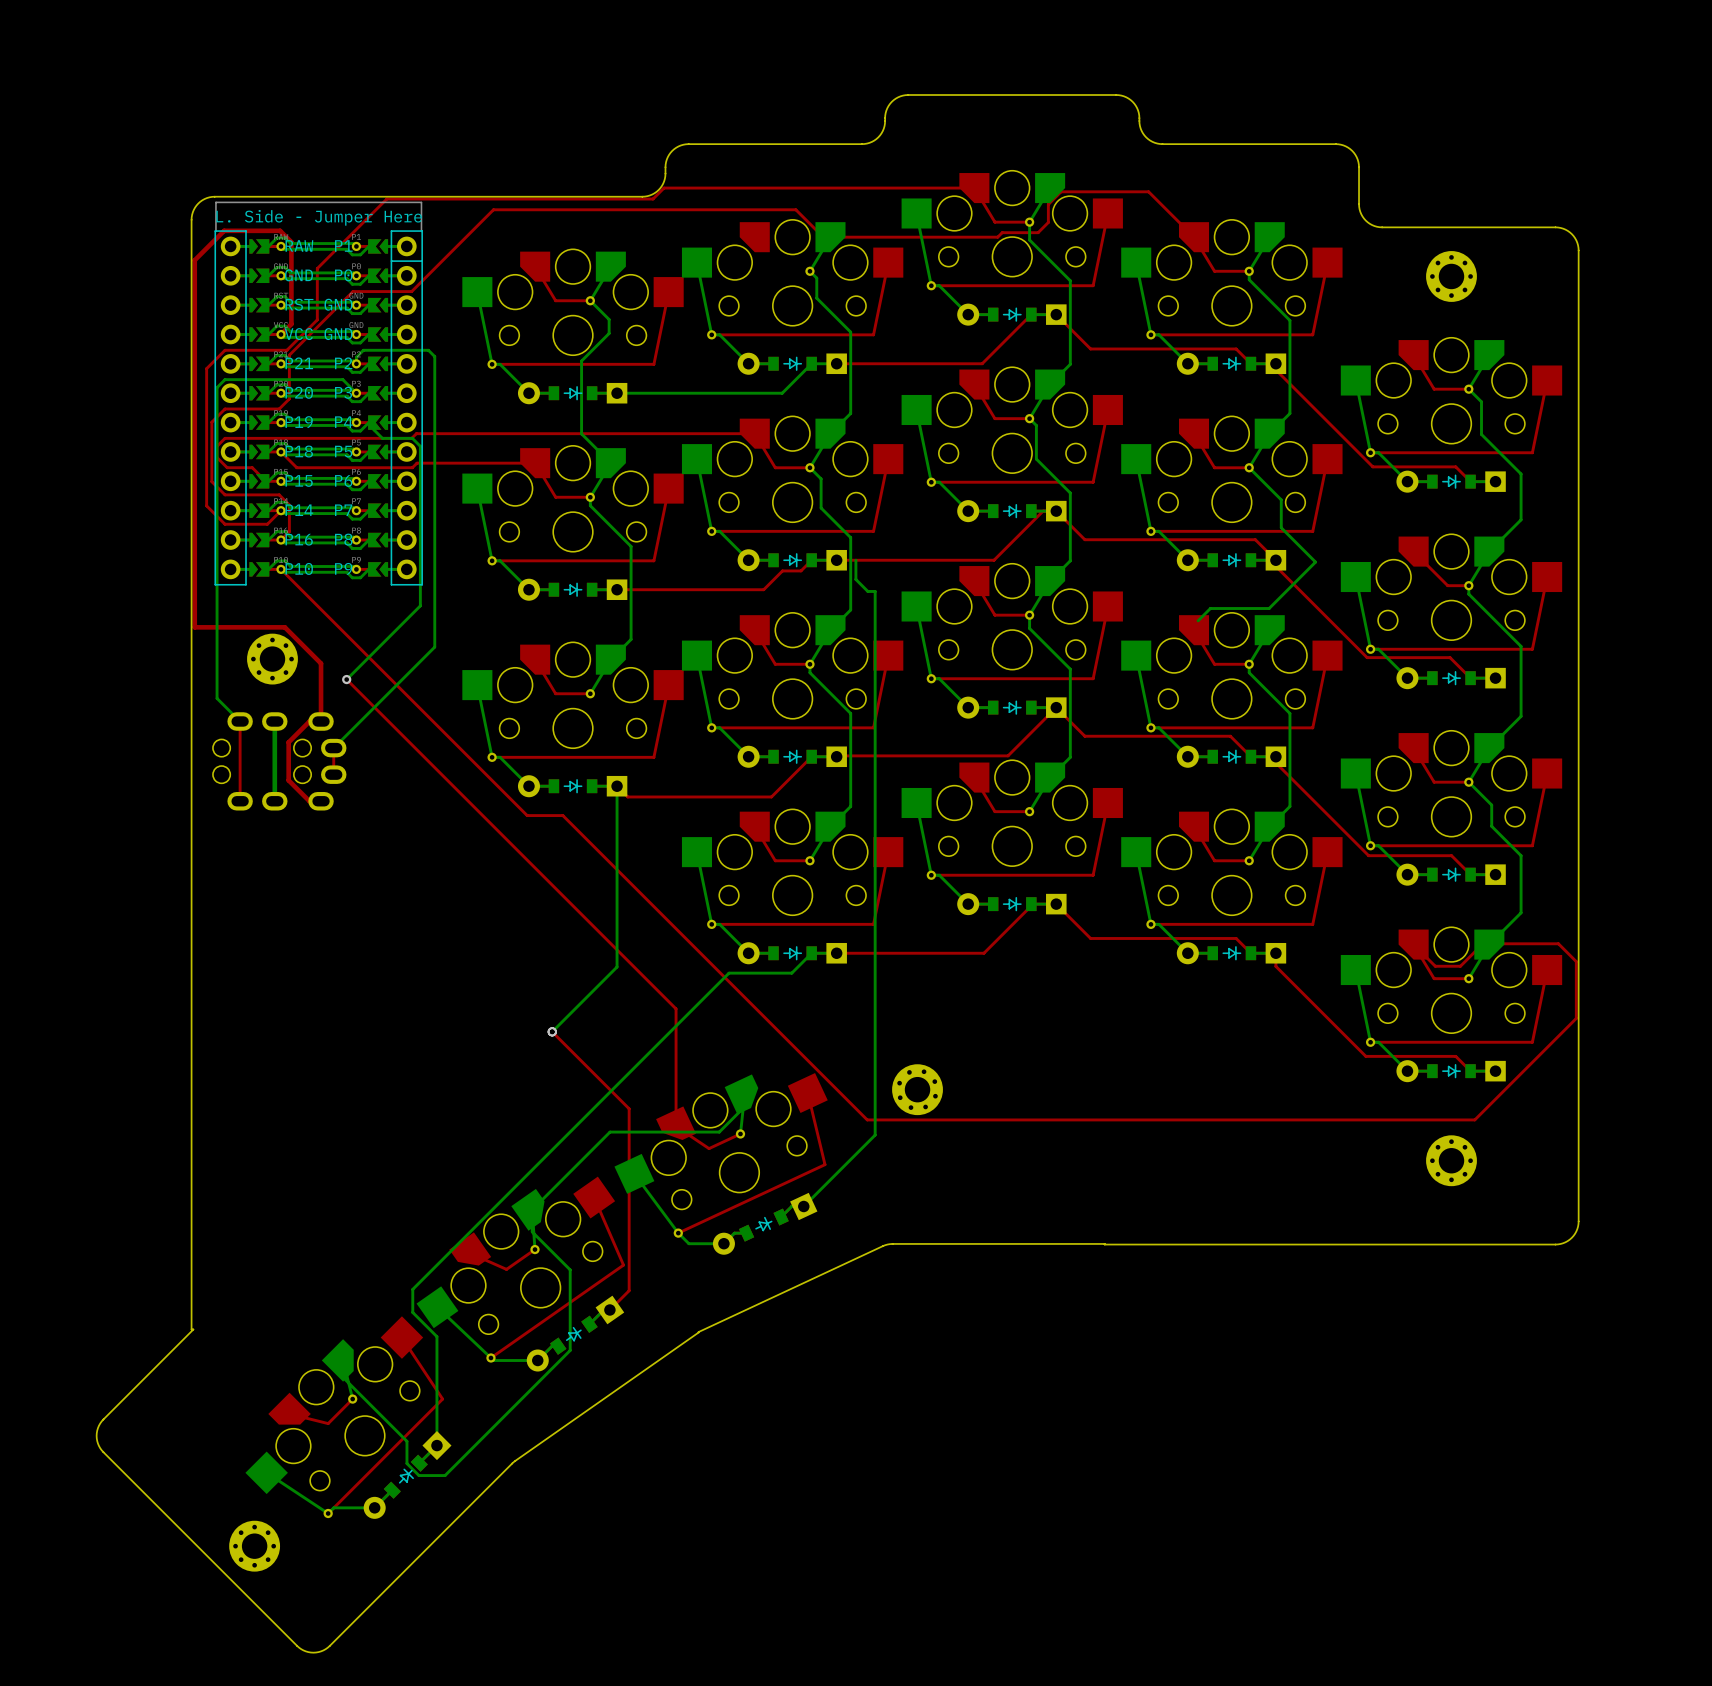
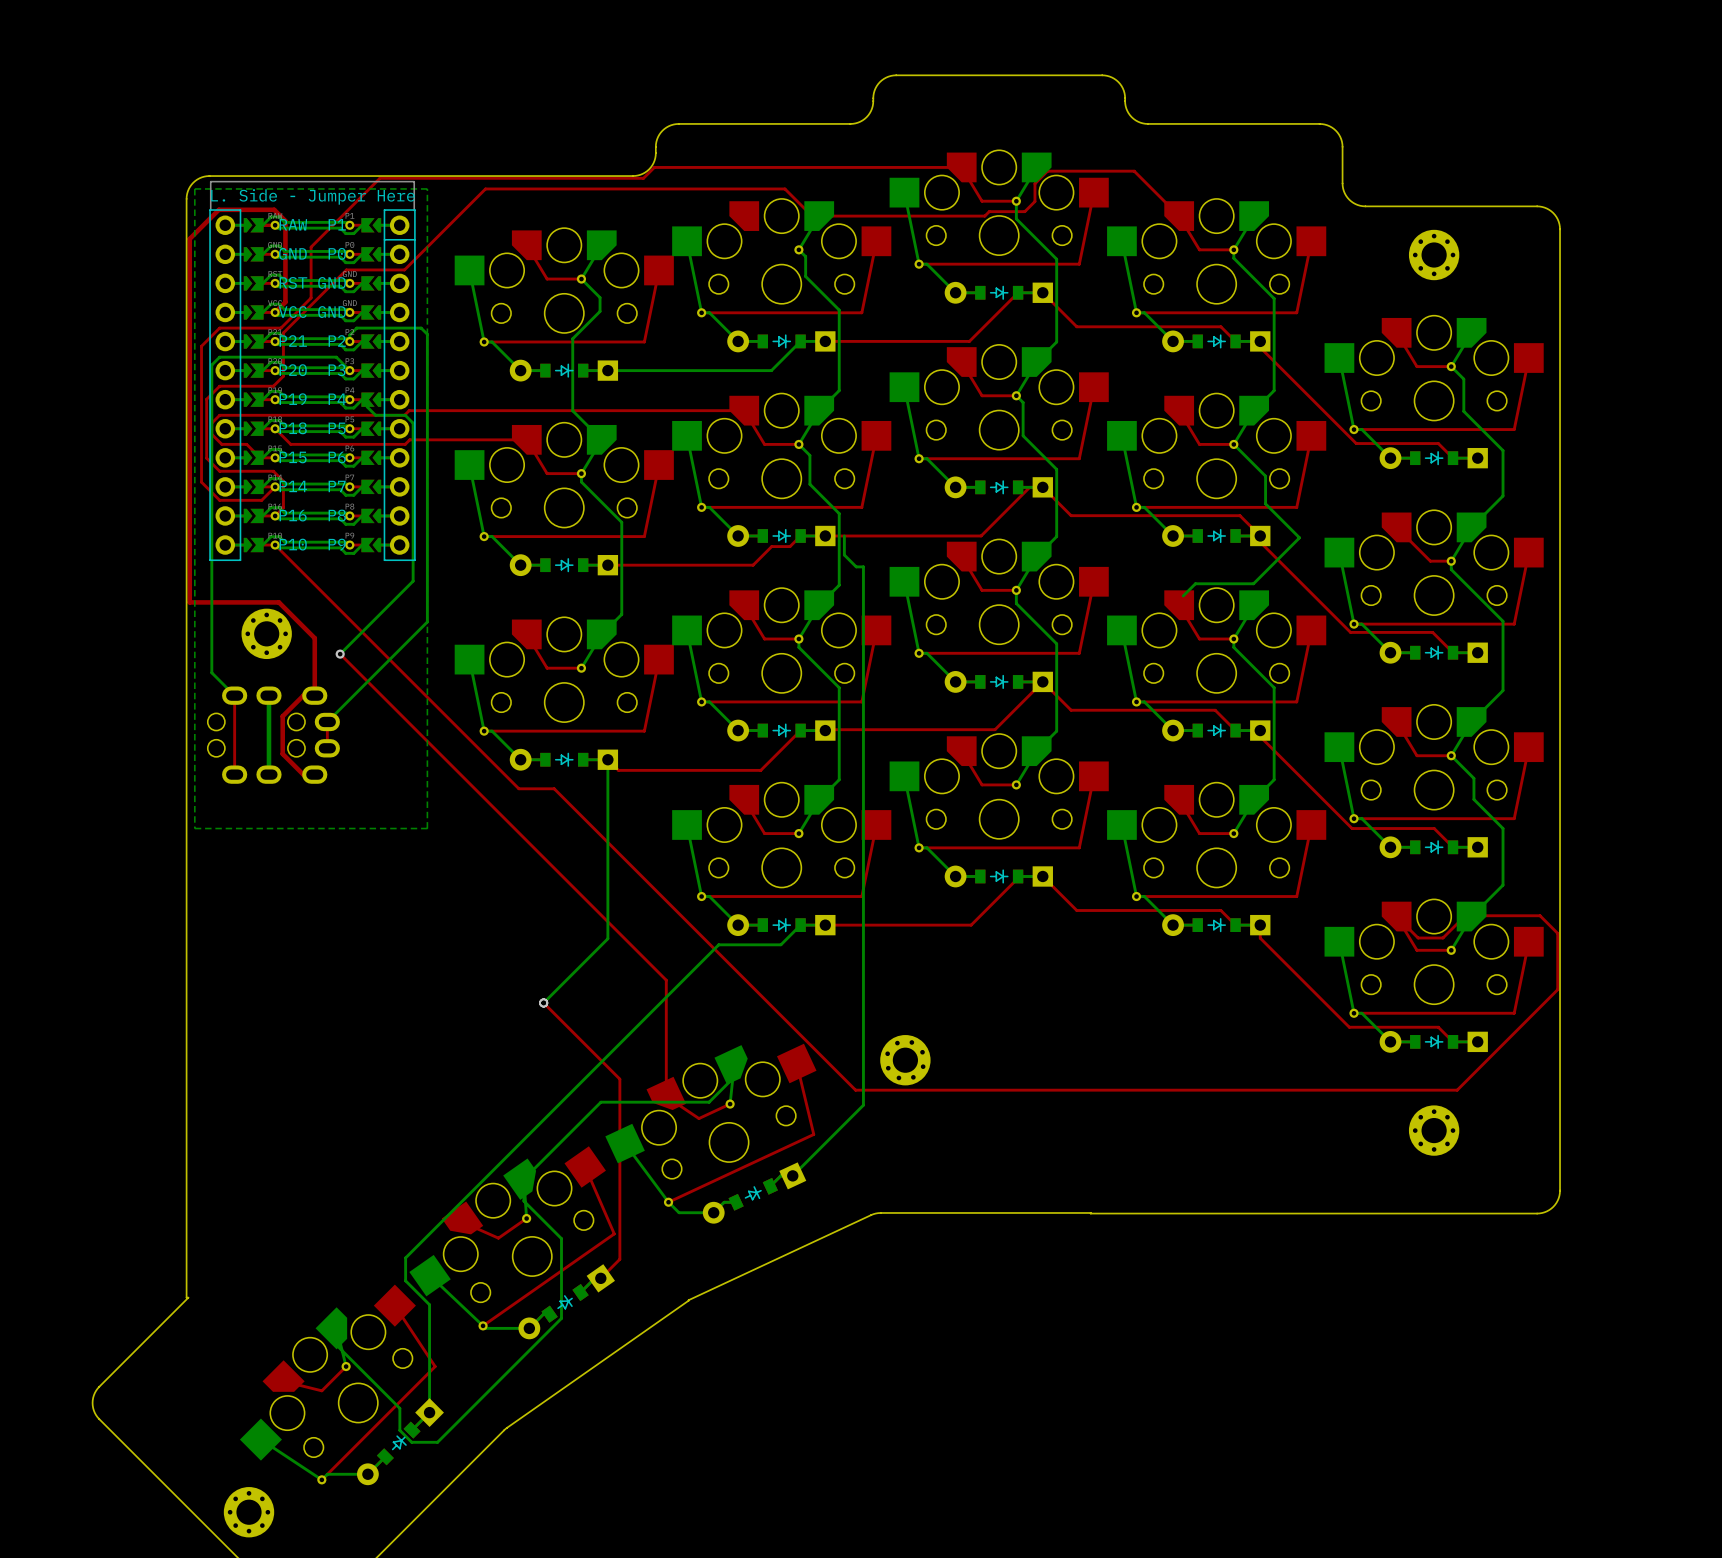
bottom zone outline: none -> (427, 188) (194, 188) (194, 828) (427, 828) (427, 188)

